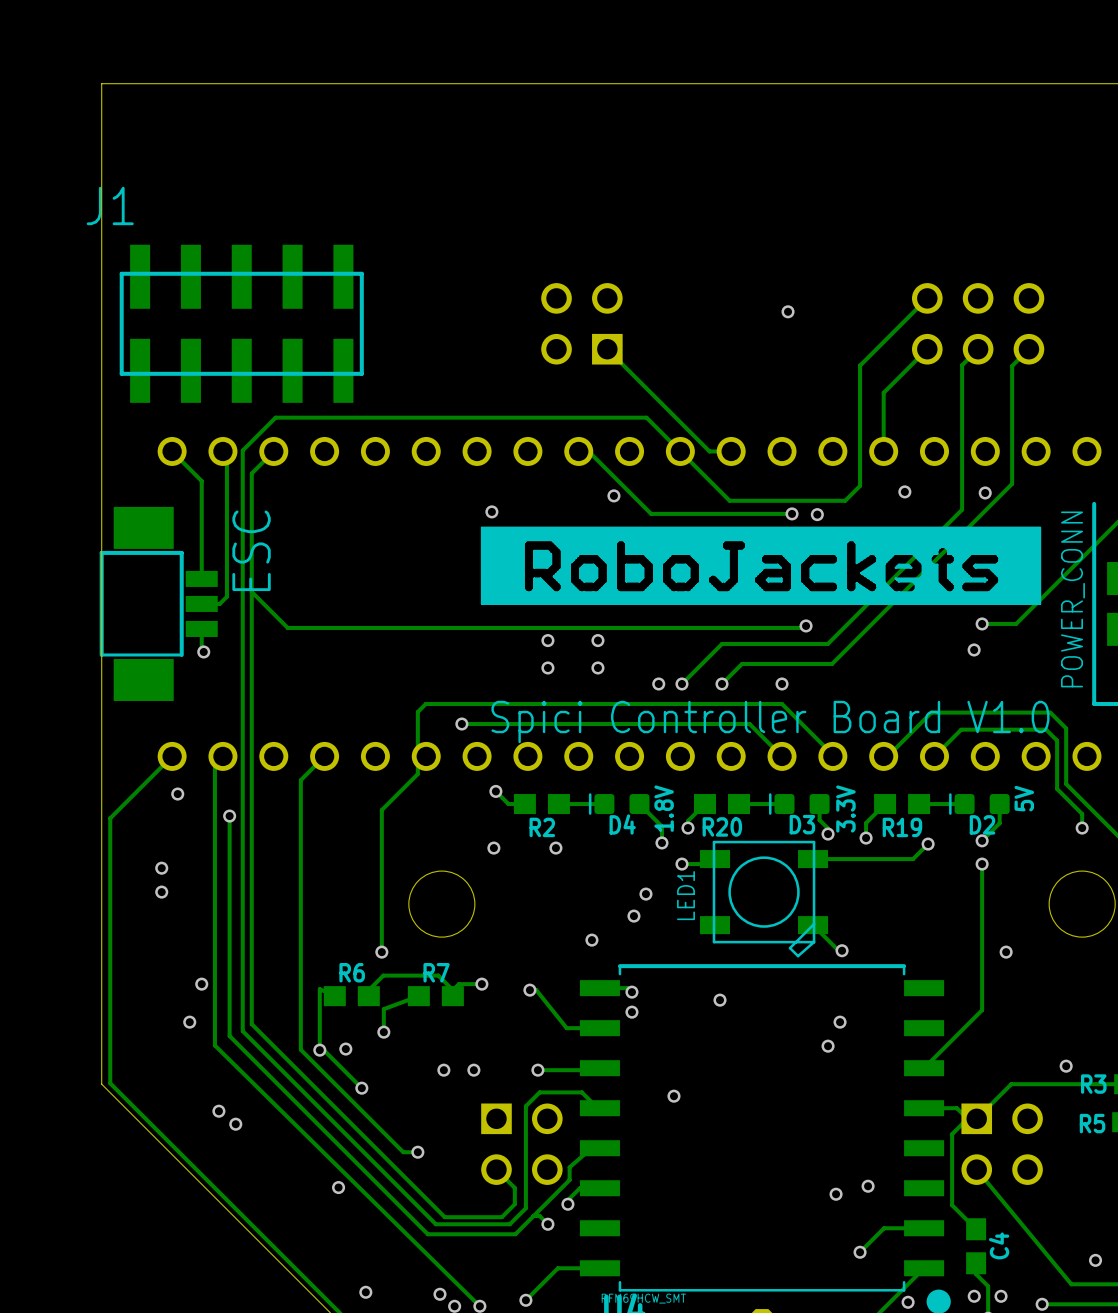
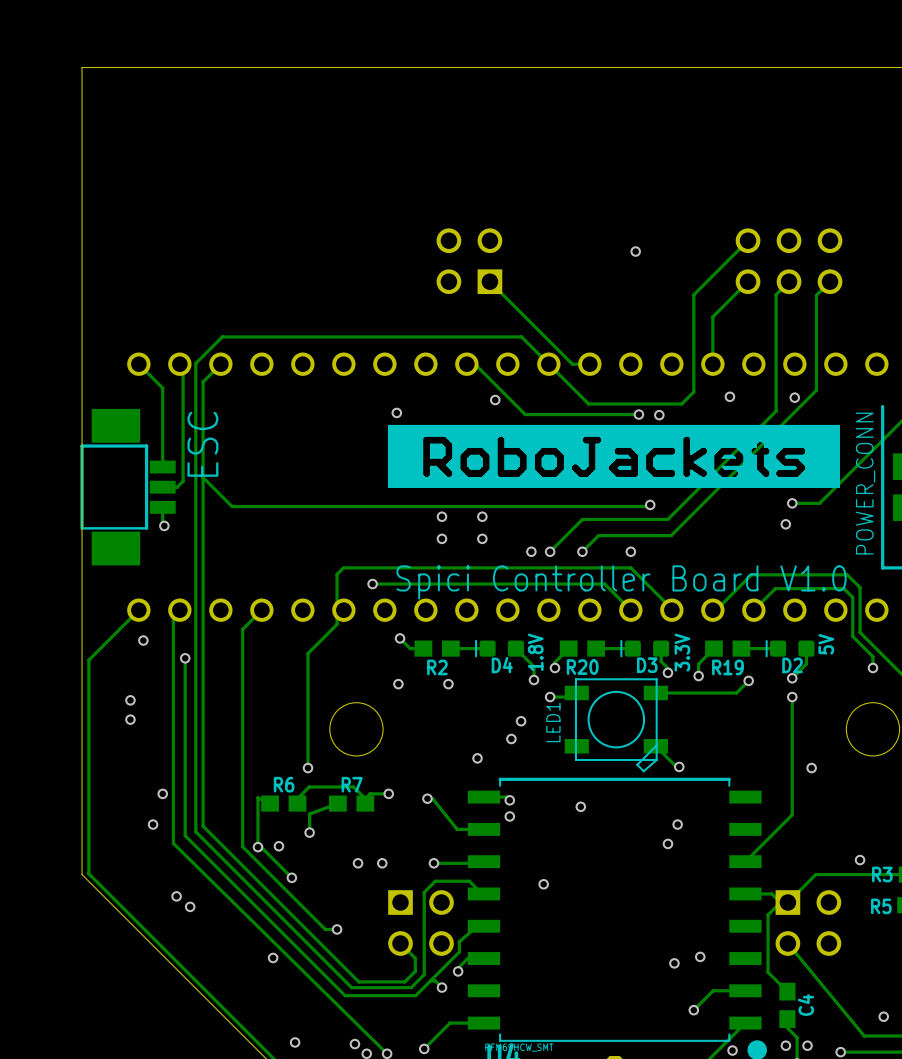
J1: (241, 323) -> none

